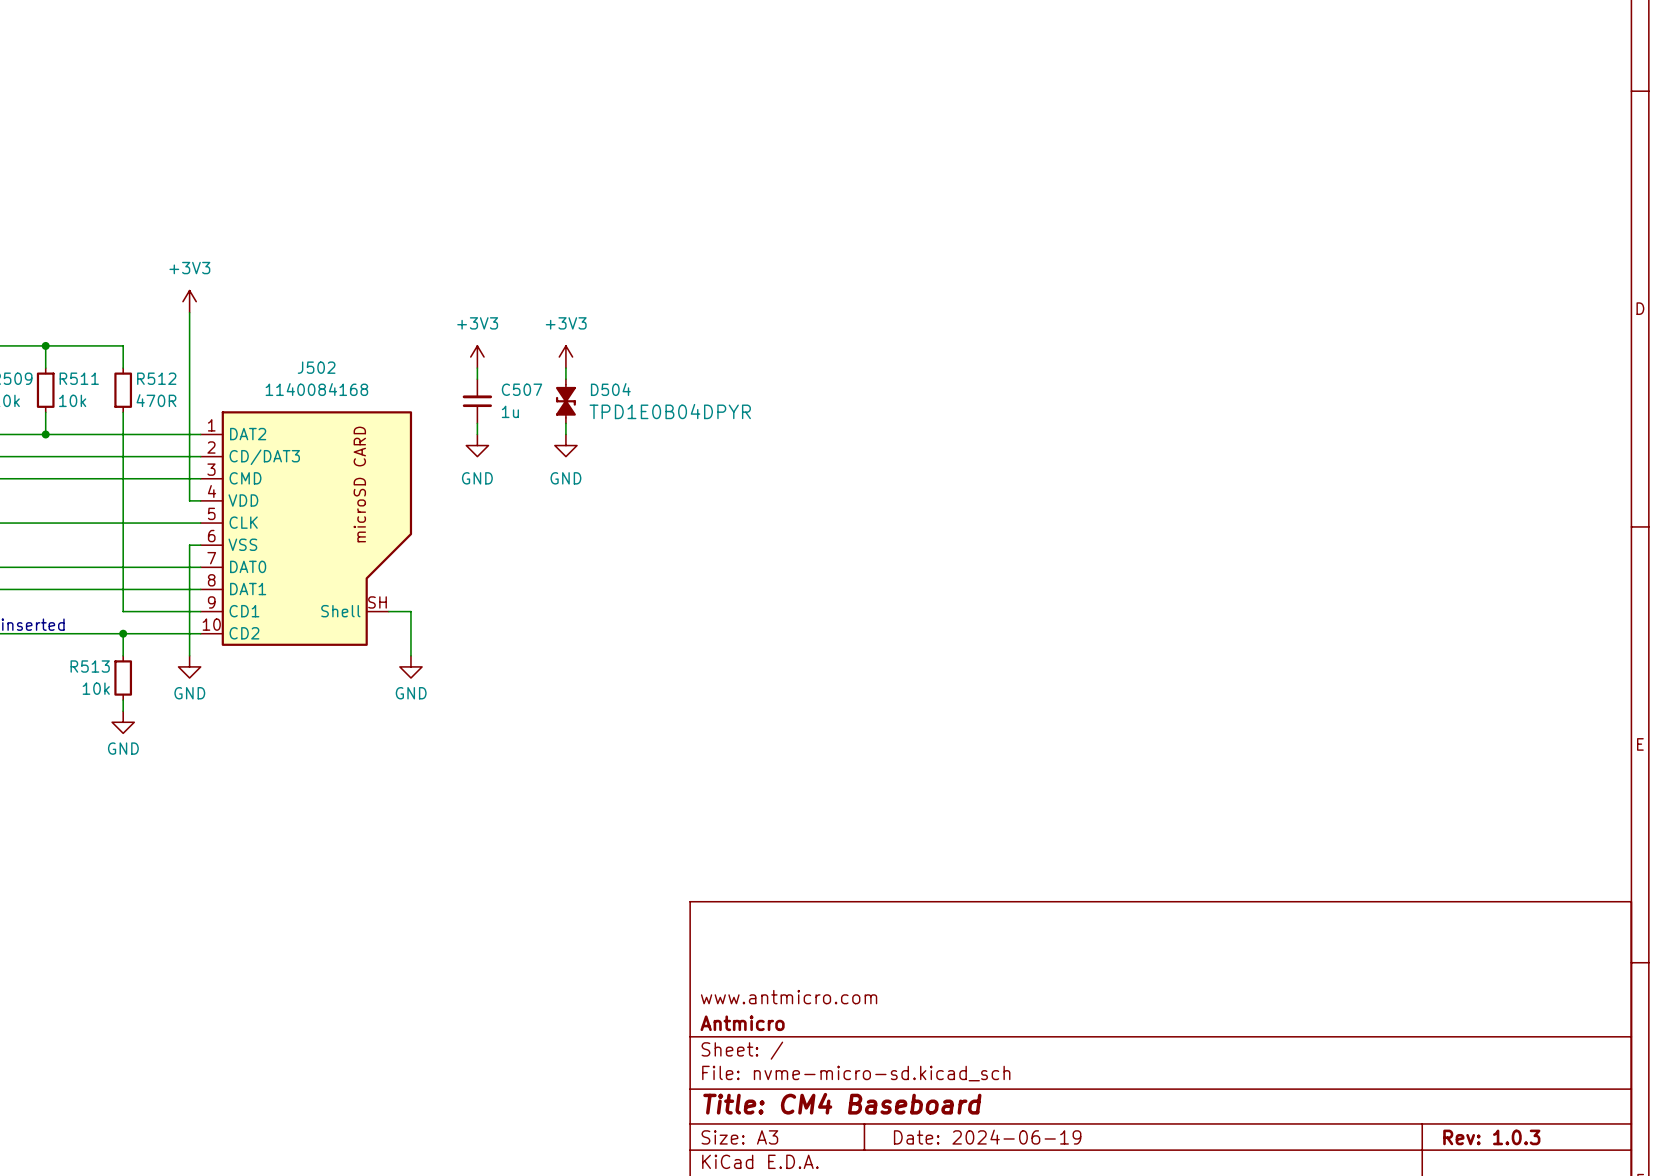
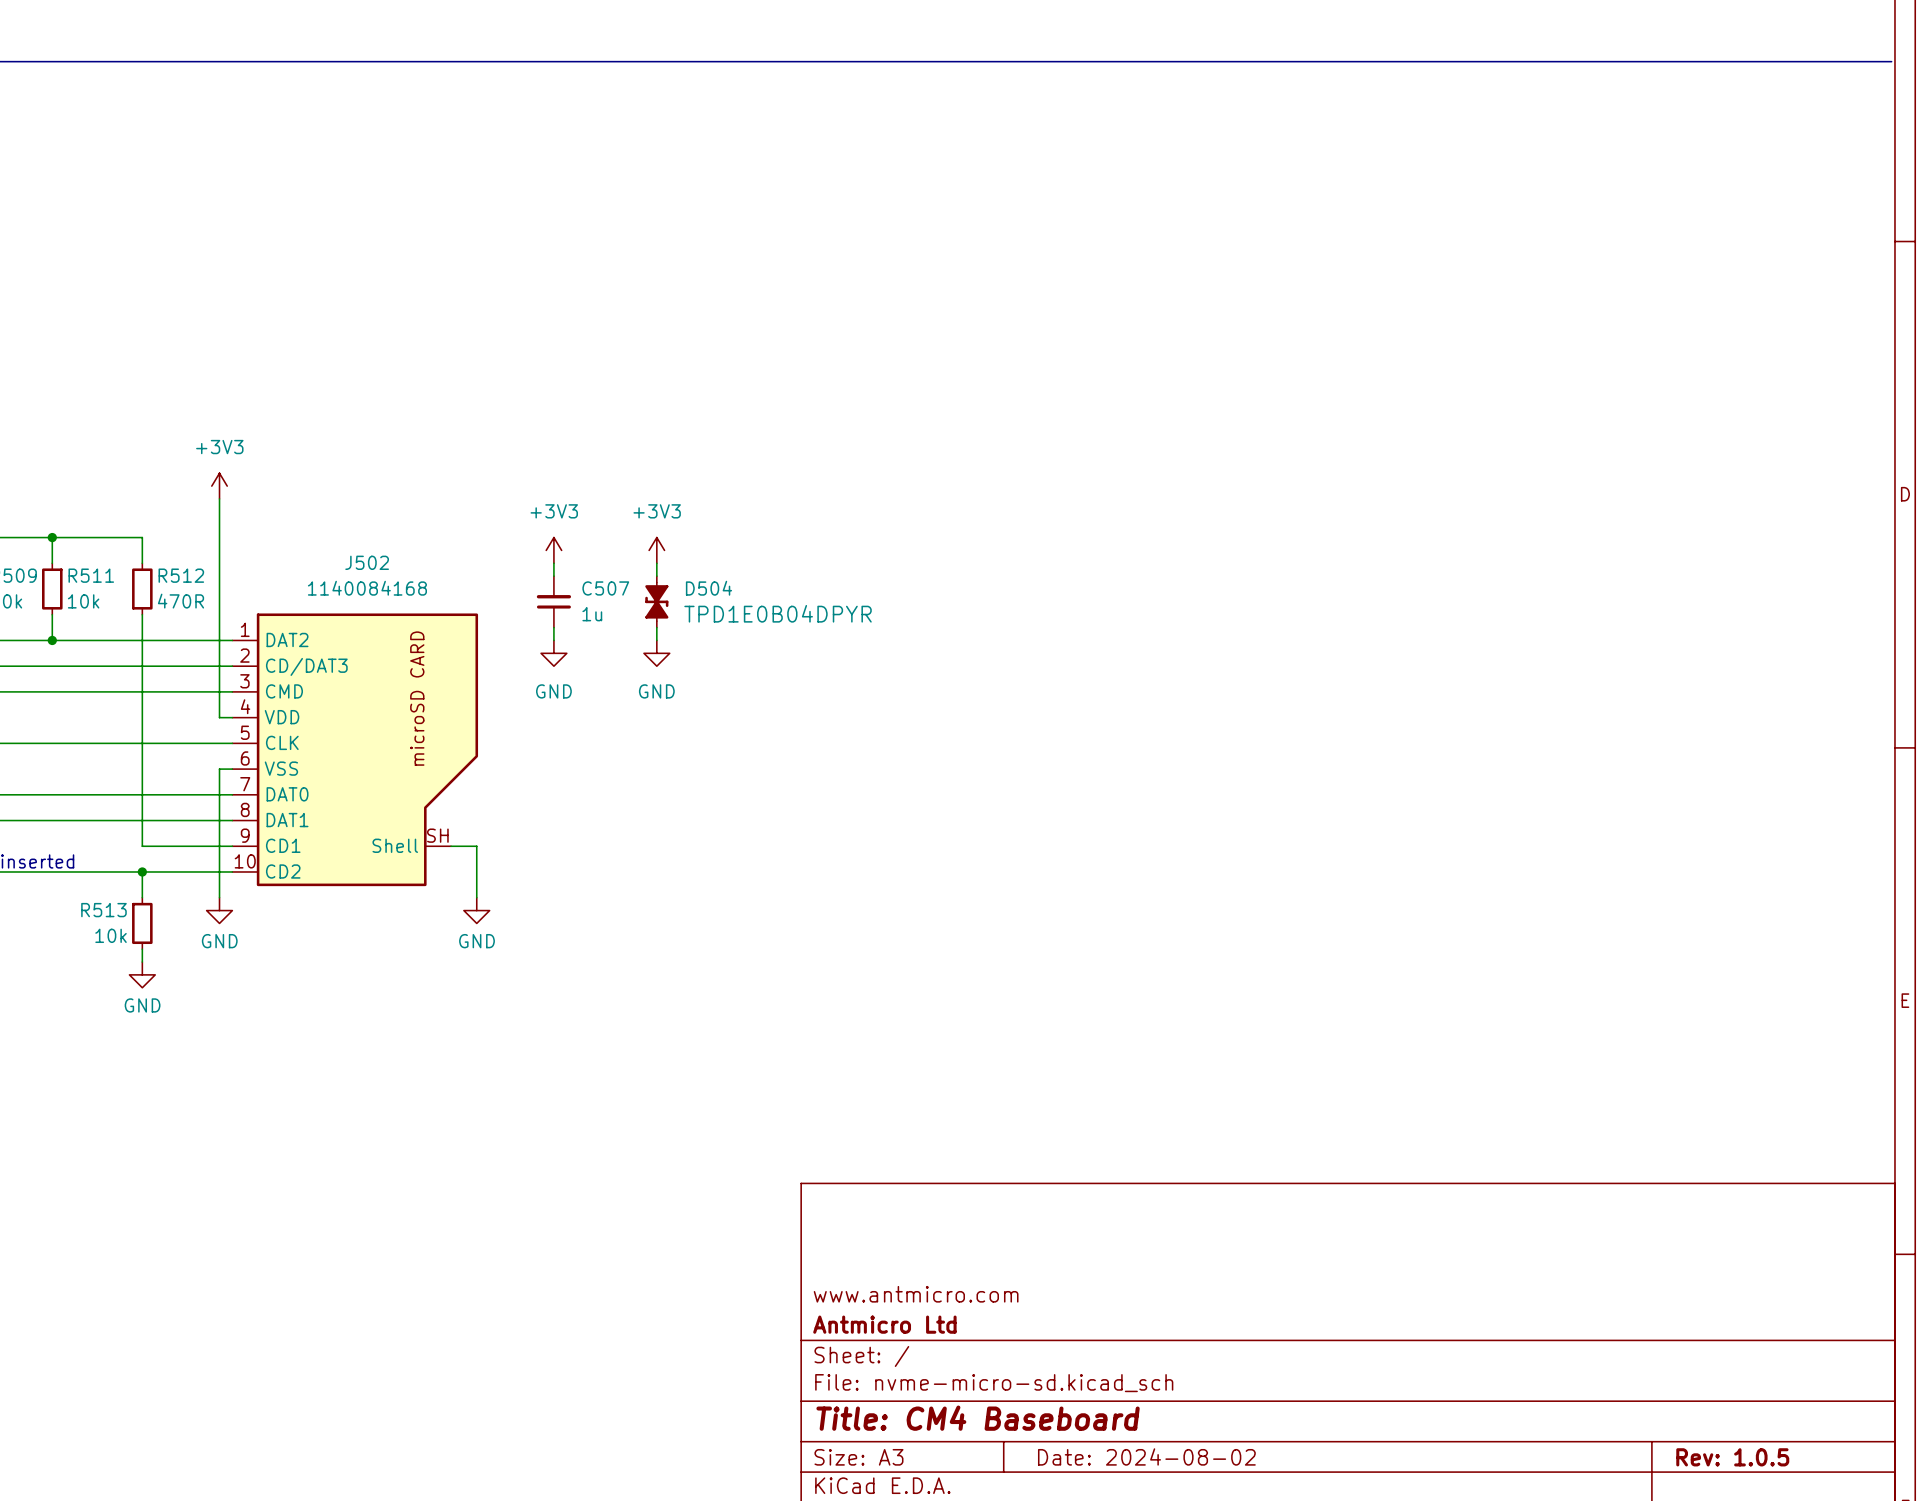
title block: Antmicro (742, 1023) -> Antmicro Ltd (884, 1324)
title block: Date: 2024-06-19 (987, 1137) -> Date: 2024-08-02 (1146, 1456)
title block: Rev: 1.0.3 (1491, 1137) -> Rev: 1.0.5 (1732, 1457)

